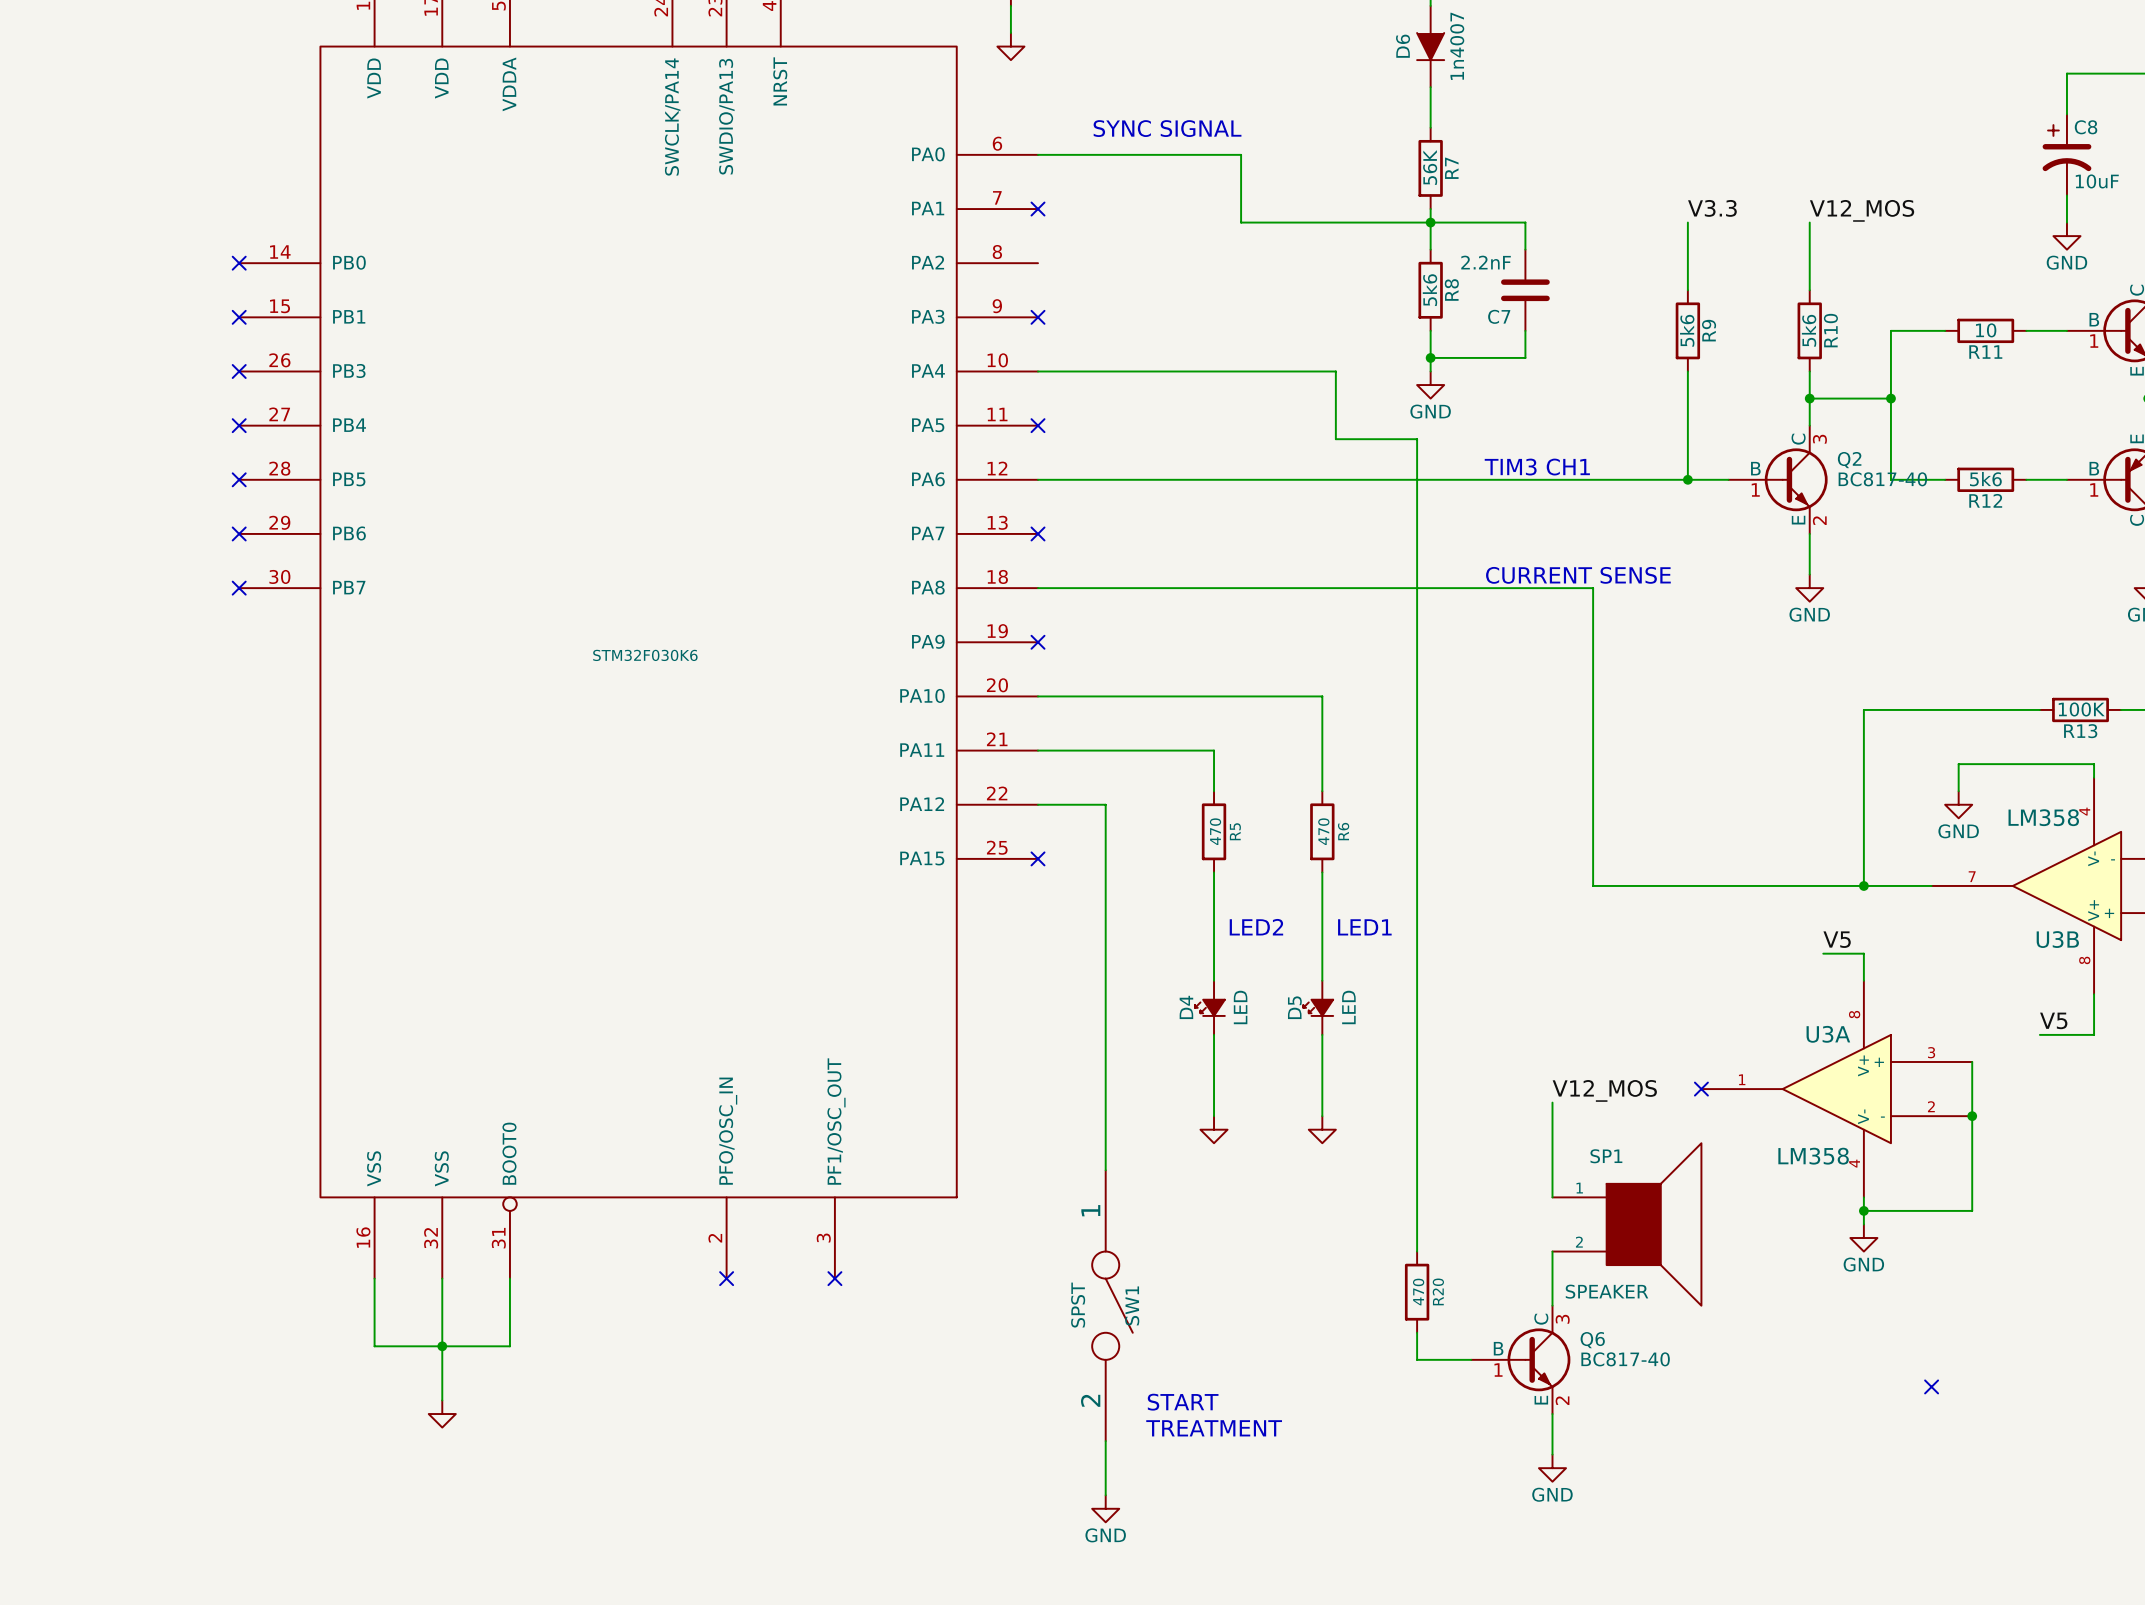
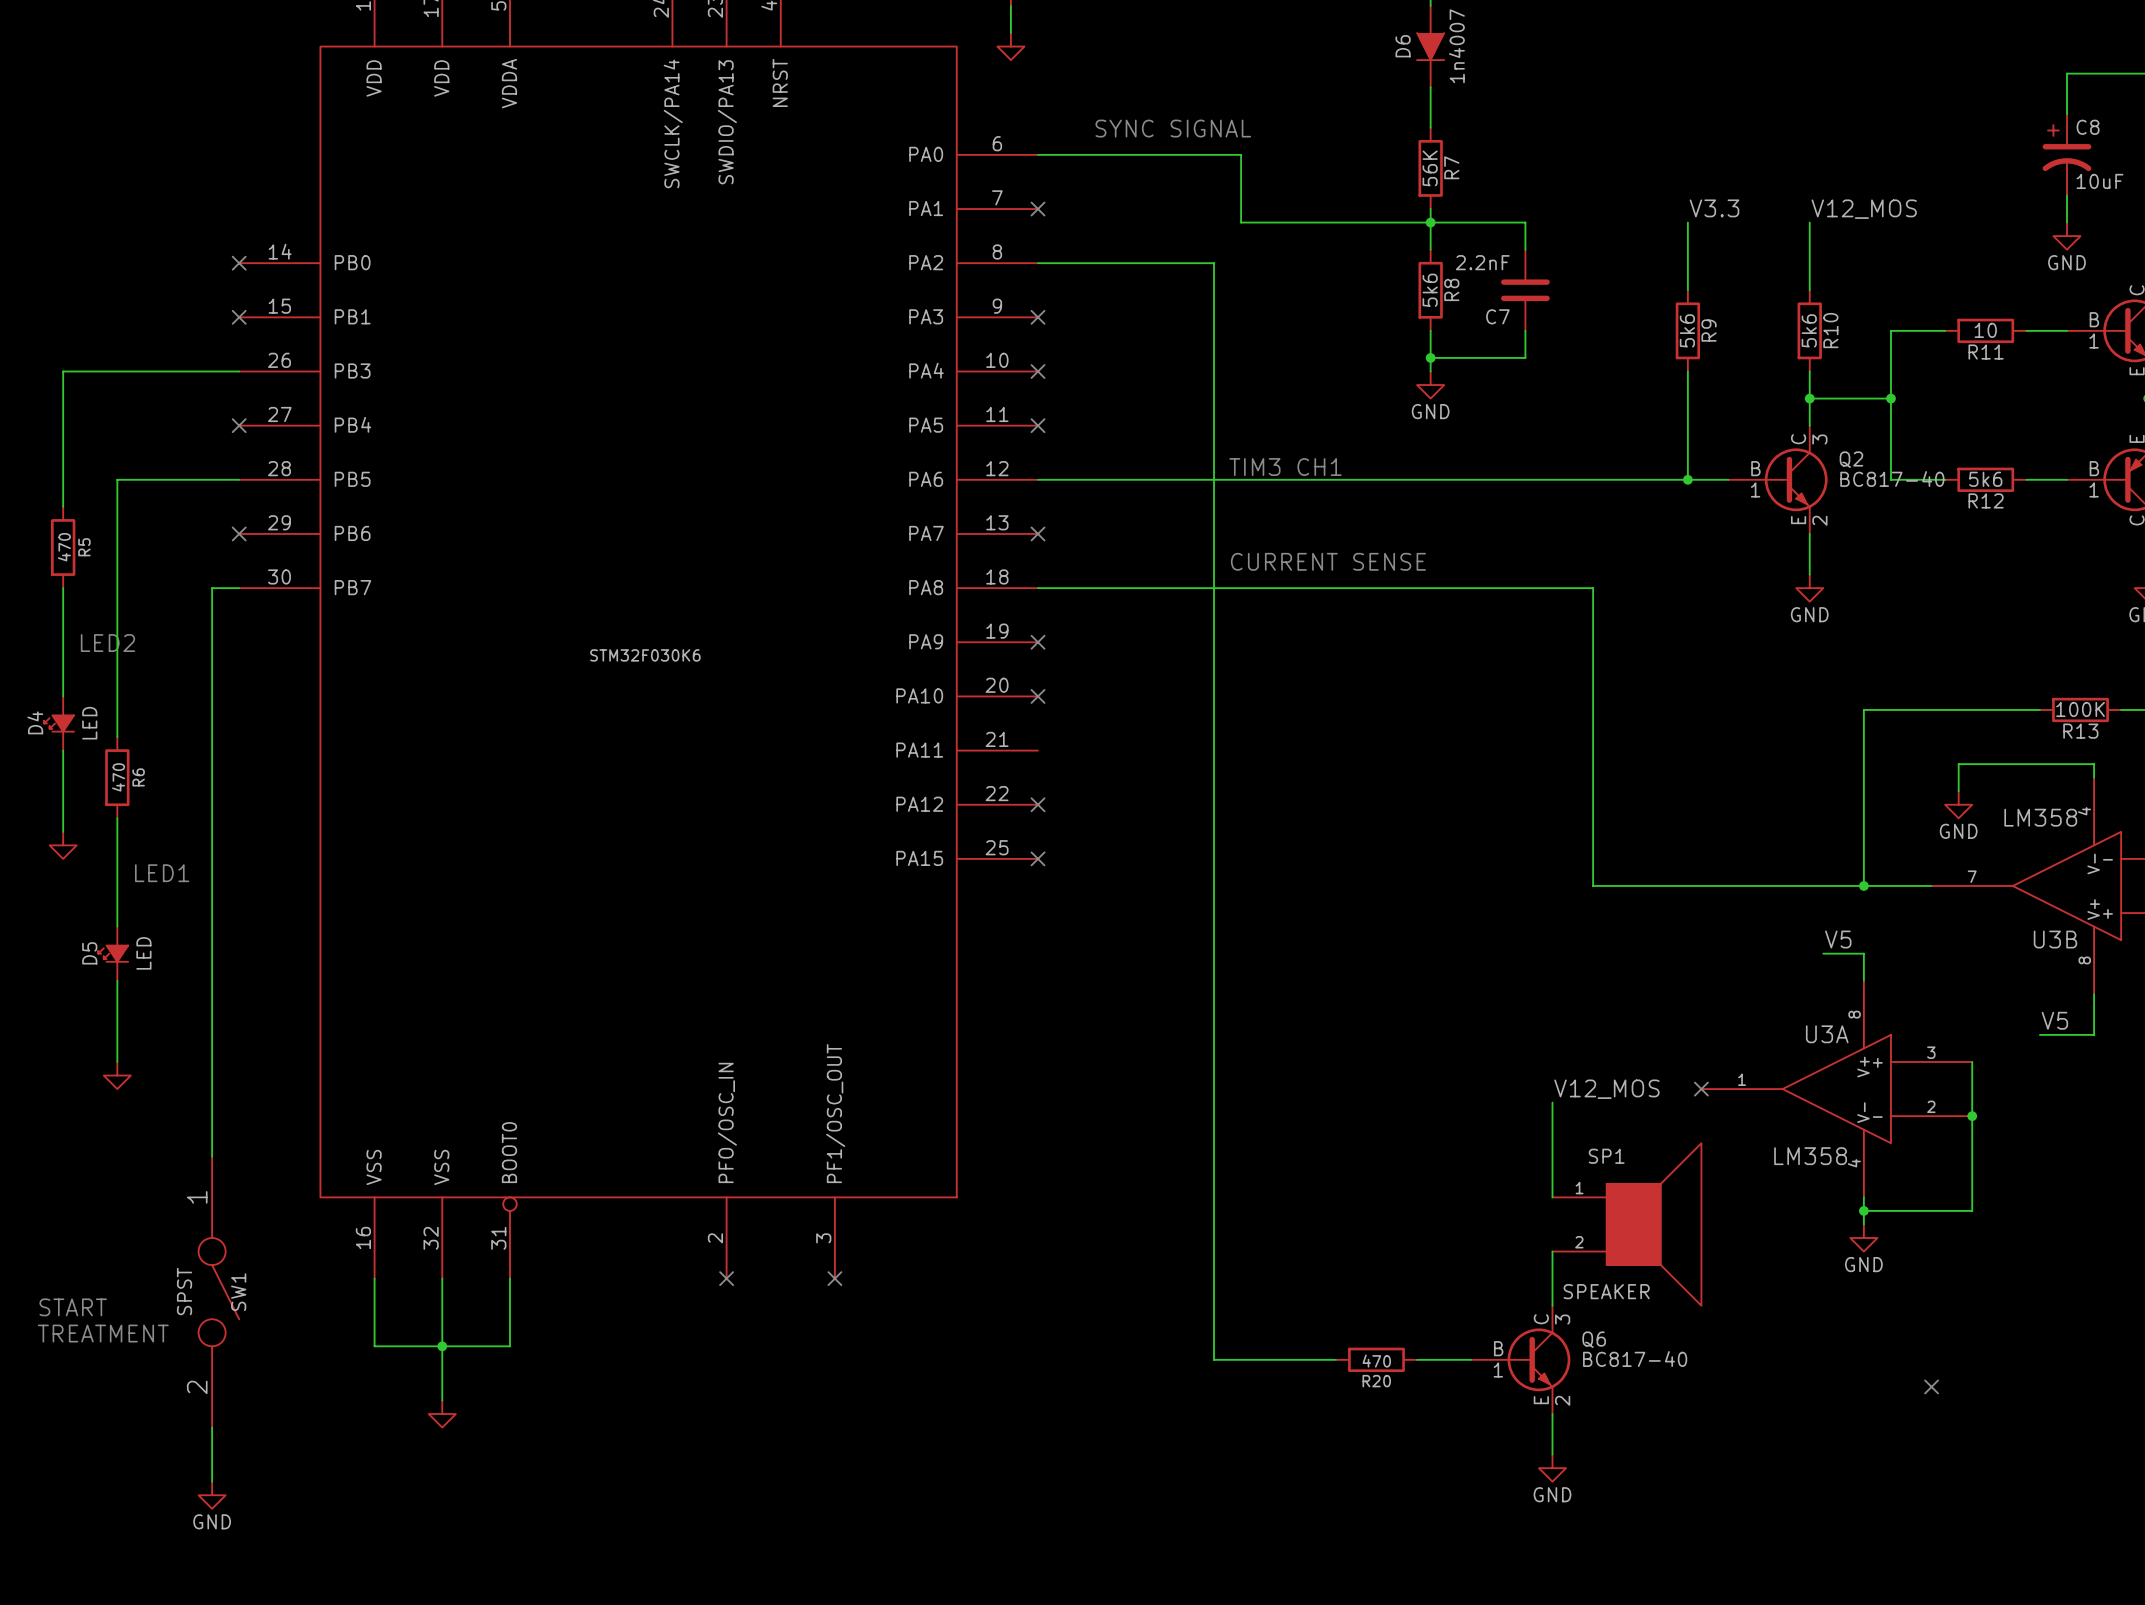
wire: none -> (239, 371) (63, 371) (63, 506)
no-connect mark: (239, 371) -> none
wire: (1038, 371) (1335, 371) (1335, 439) (1417, 439) (1417, 1251) -> none
no-connect mark: none -> (1038, 371)
text position: TIM3 CH1 (1537, 467) -> TIM3 CH1 (1285, 467)
wire: none -> (239, 479) (117, 479) (117, 737)
no-connect mark: (239, 479) -> none
text position: CURRENT SENSE (1578, 575) -> CURRENT SENSE (1328, 561)
wire: none -> (63, 588) (63, 696)
wire: none -> (239, 588) (212, 588) (212, 1156)
no-connect mark: (239, 588) -> none
text: none -> LED2 (107, 643)
wire: (1038, 696) (1322, 696) (1322, 791) -> none
no-connect mark: none -> (1038, 696)
wire: none -> (63, 750) (63, 831)
wire: (1038, 750) (1214, 750) -> (1038, 263) (1214, 263) (1214, 750)
wire: none -> (1214, 791) (1214, 872)
wire: (1038, 804) (1105, 804) (1105, 1170) -> none
no-connect mark: none -> (1038, 804)
wire: none -> (117, 818) (117, 926)
R5 position: (1214, 831) -> (63, 547)
R6 position: (1322, 831) -> (117, 777)
power symbol: none -> (63, 845)
wire: (1322, 872) (1322, 980) -> none
text: none -> LED1 (162, 873)
text: LED2 (1256, 927) -> none
text: LED1 (1364, 927) -> none
wire: none -> (117, 980) (117, 1061)
D4 position: (1209, 1007) -> (59, 723)
D5 position: (1318, 1007) -> (113, 953)
wire: (1322, 1034) (1322, 1116) -> none
power symbol: none -> (117, 1075)
wire: none -> (1214, 1116) (1214, 1359) (1335, 1359)
power symbol: (1214, 1129) -> none
power symbol: (1322, 1129) -> none
R20 rotation: 0° (1417, 1292) -> 90° clockwise (1376, 1359)
R20 position: (1417, 1292) -> (1376, 1359)
SW1 position: (1112, 1305) -> (218, 1292)
text: none -> START (73, 1307)
wire: (1417, 1332) (1417, 1359) -> none
text: none -> TREATMENT (103, 1333)
text: START (1183, 1402) -> none
wire: none -> (212, 1427) (212, 1481)
text: TREATMENT (1214, 1428) -> none
wire: (1105, 1441) (1105, 1495) -> none
power symbol: none -> GND (212, 1495)
power symbol: GND (1105, 1508) -> none

